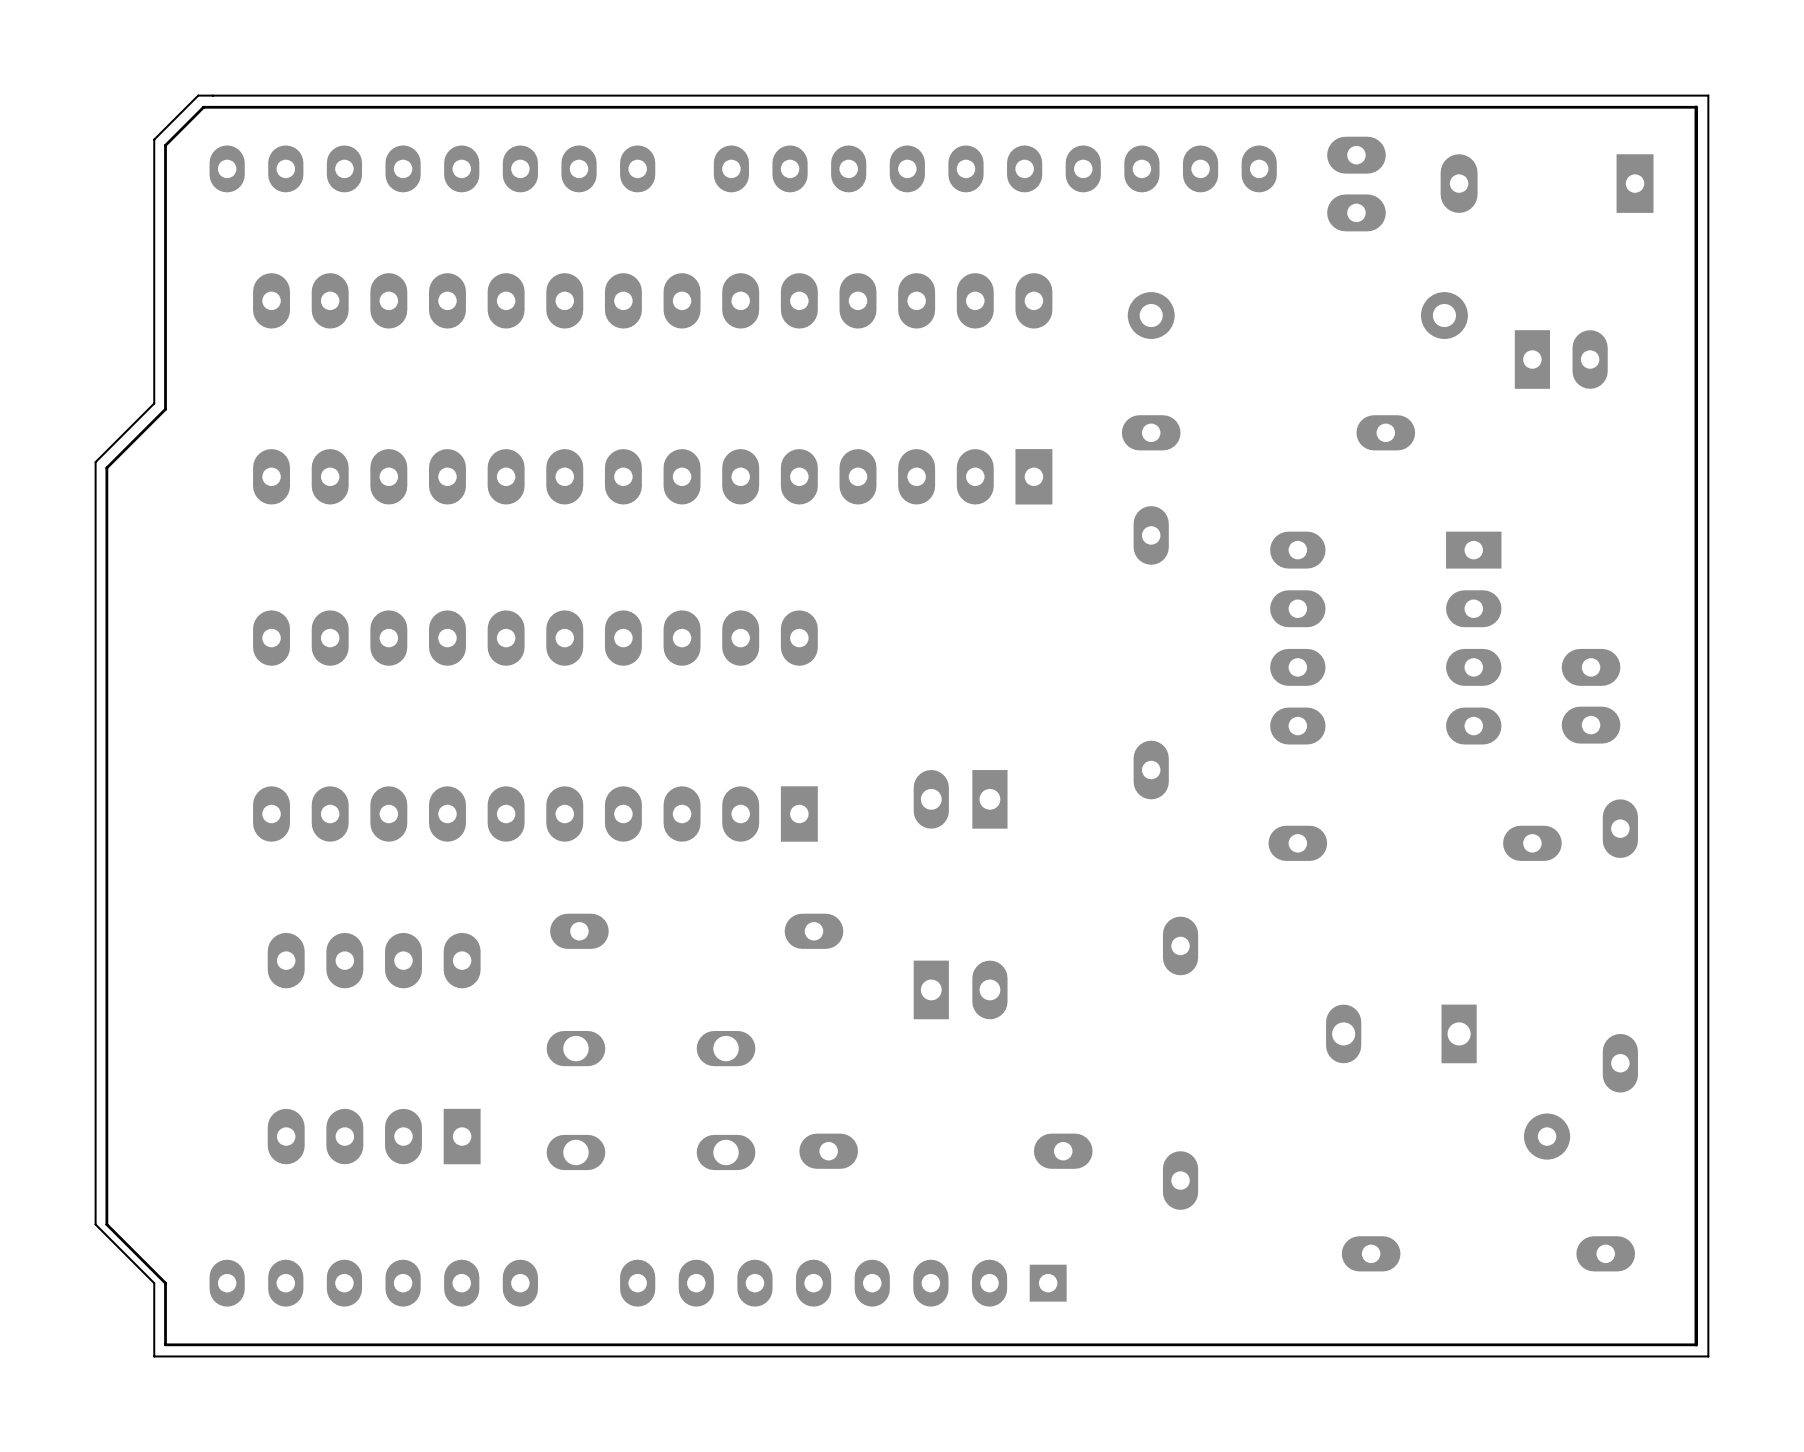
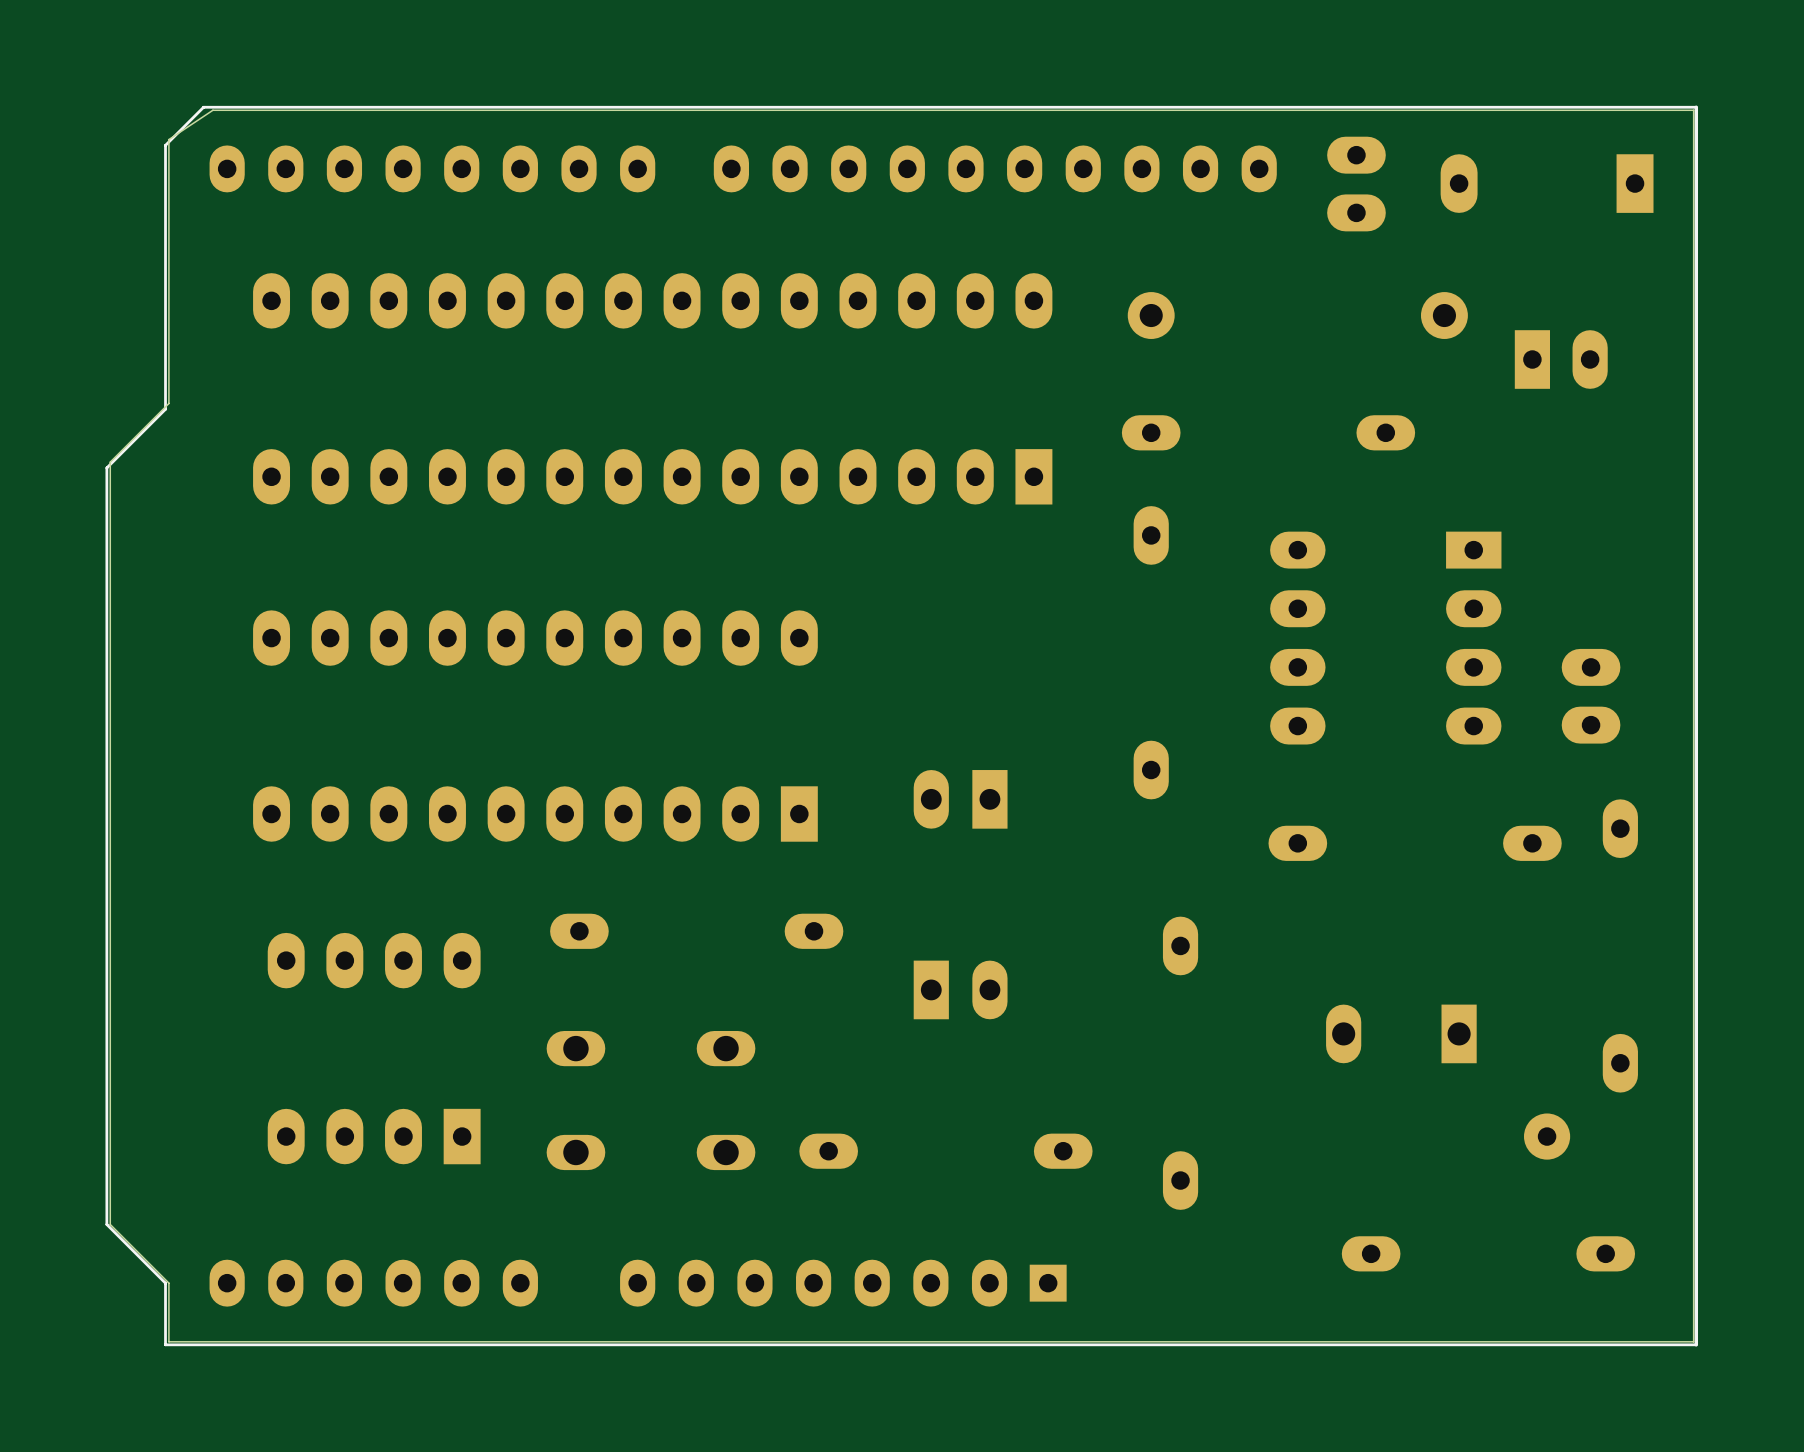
board edge: (1708, 95) (198, 95) (154, 139) (154, 403) (95, 462) (95, 1224) (154, 1283) (154, 1356) (1708, 1356) (1708, 95) -> (1693, 110) (1693, 1341) (168, 1341) (168, 1283) (110, 1224) (110, 462) (168, 403) (168, 139) (212, 110) (1693, 110)

